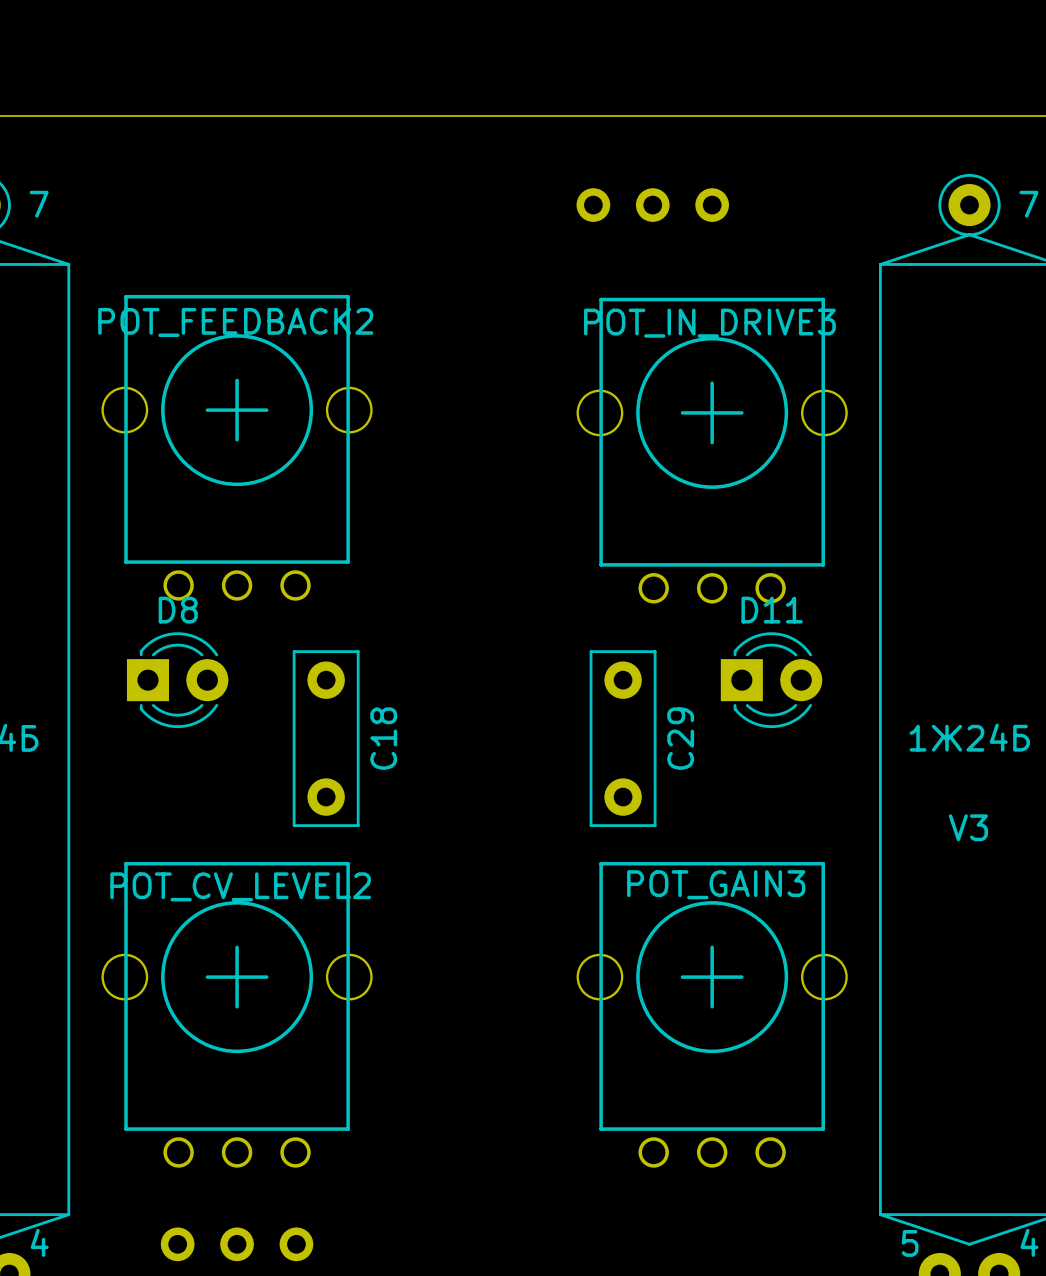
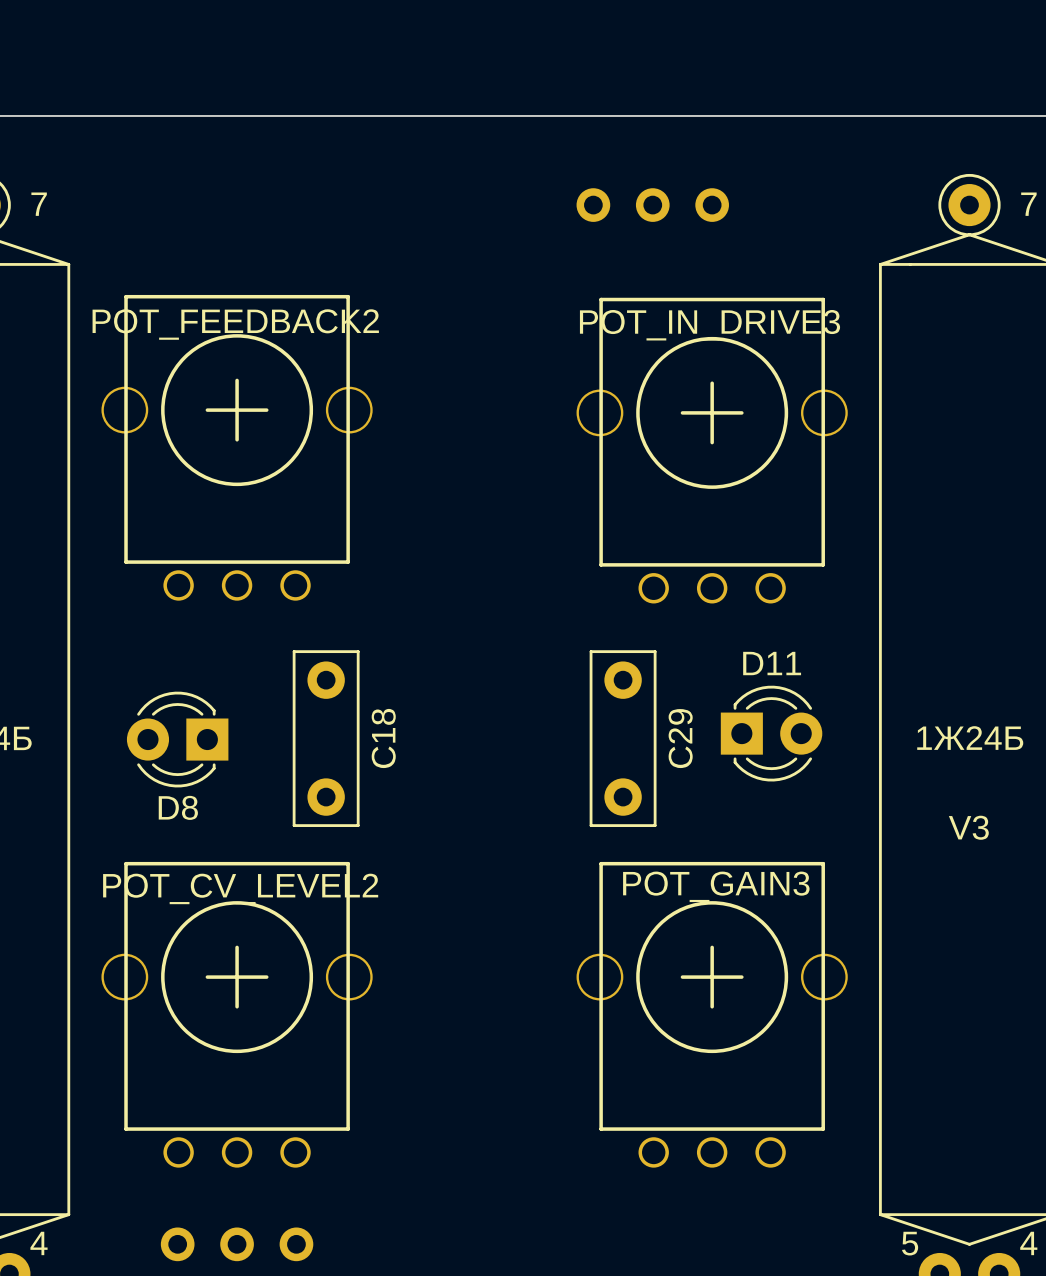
D8 rotation: 0° (177, 680) -> 180° (177, 739)
D11 position: (771, 680) -> (771, 733)

